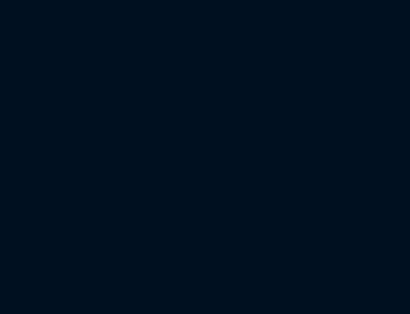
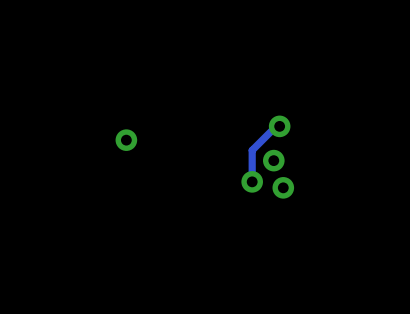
track: none -> (279, 126) (275, 126) (252, 150) (252, 181)
via: none -> (279, 126)
via: none -> (126, 140)
via: none -> (273, 160)
via: none -> (252, 181)
via: none -> (283, 187)

